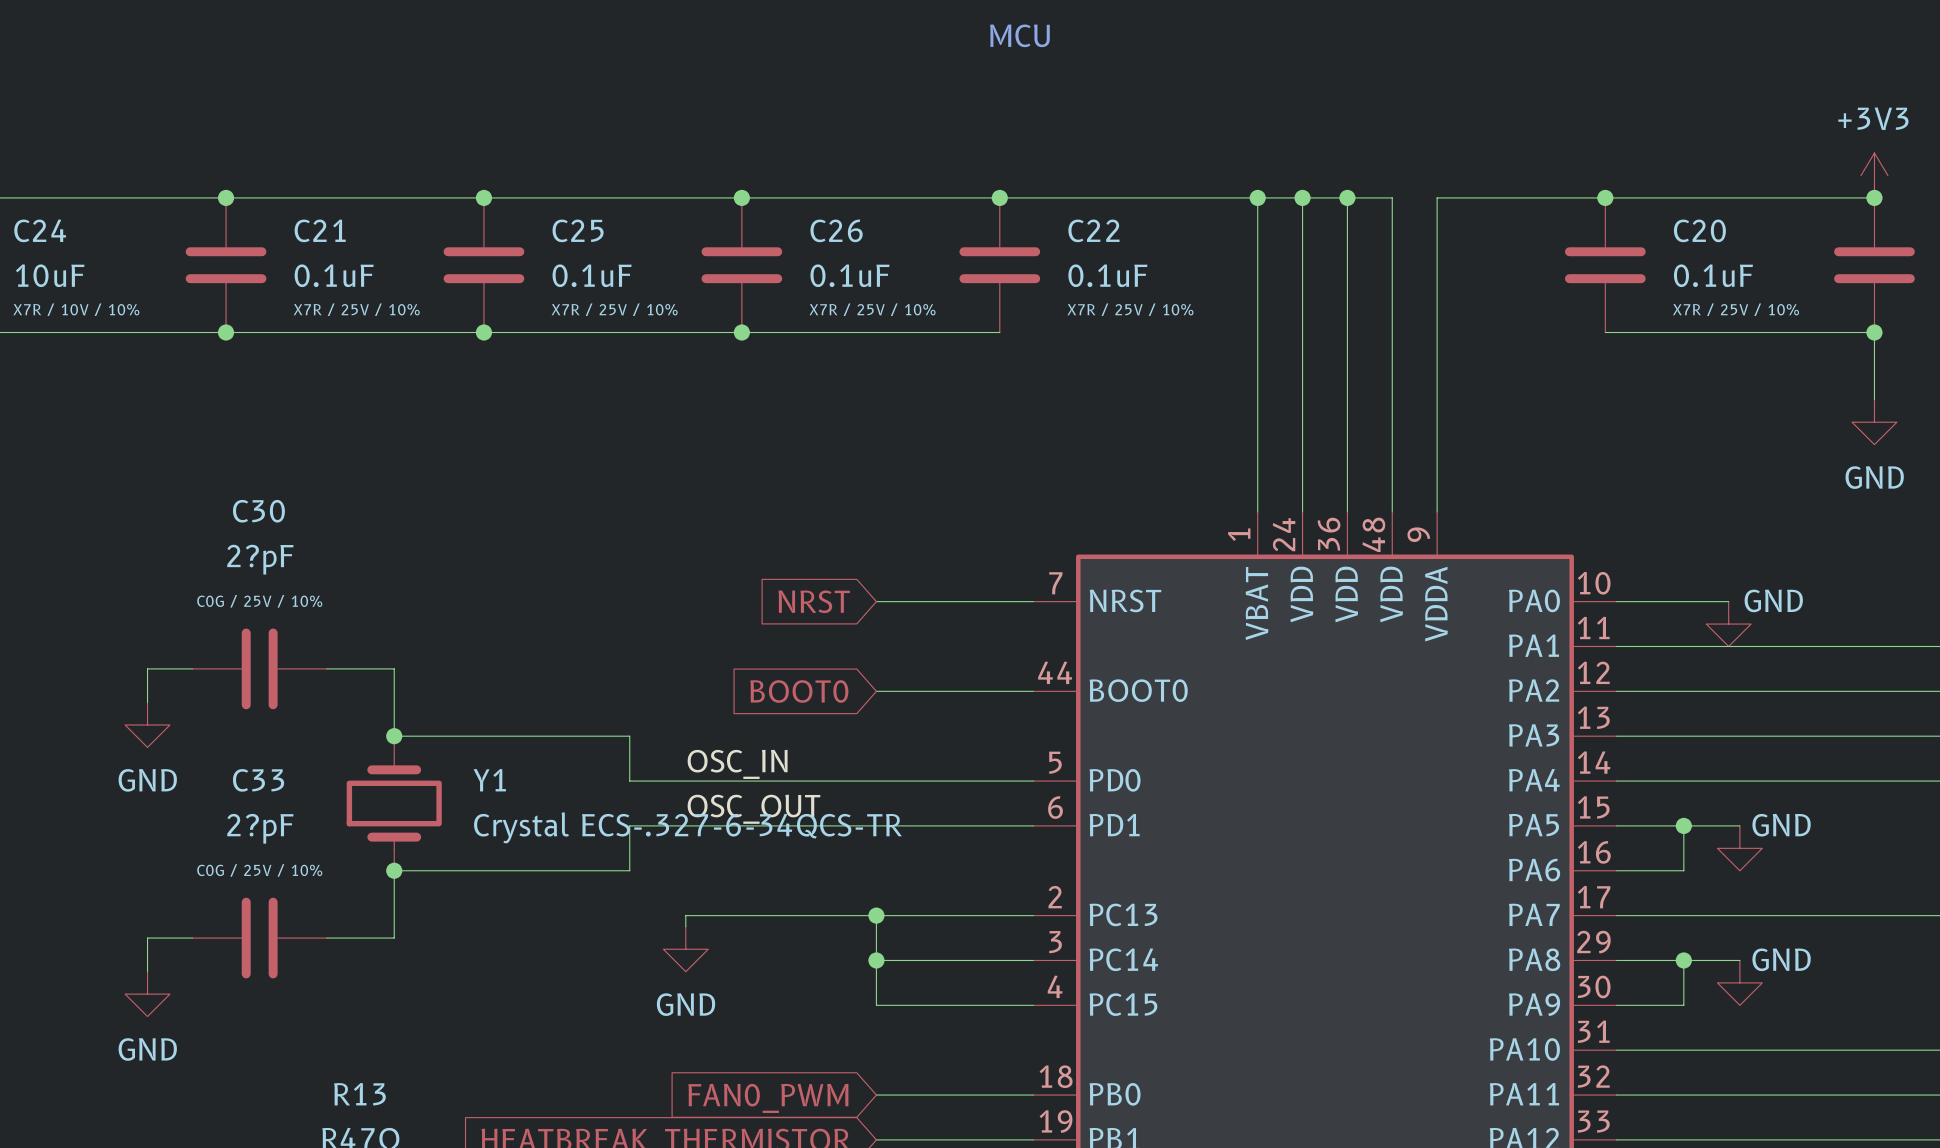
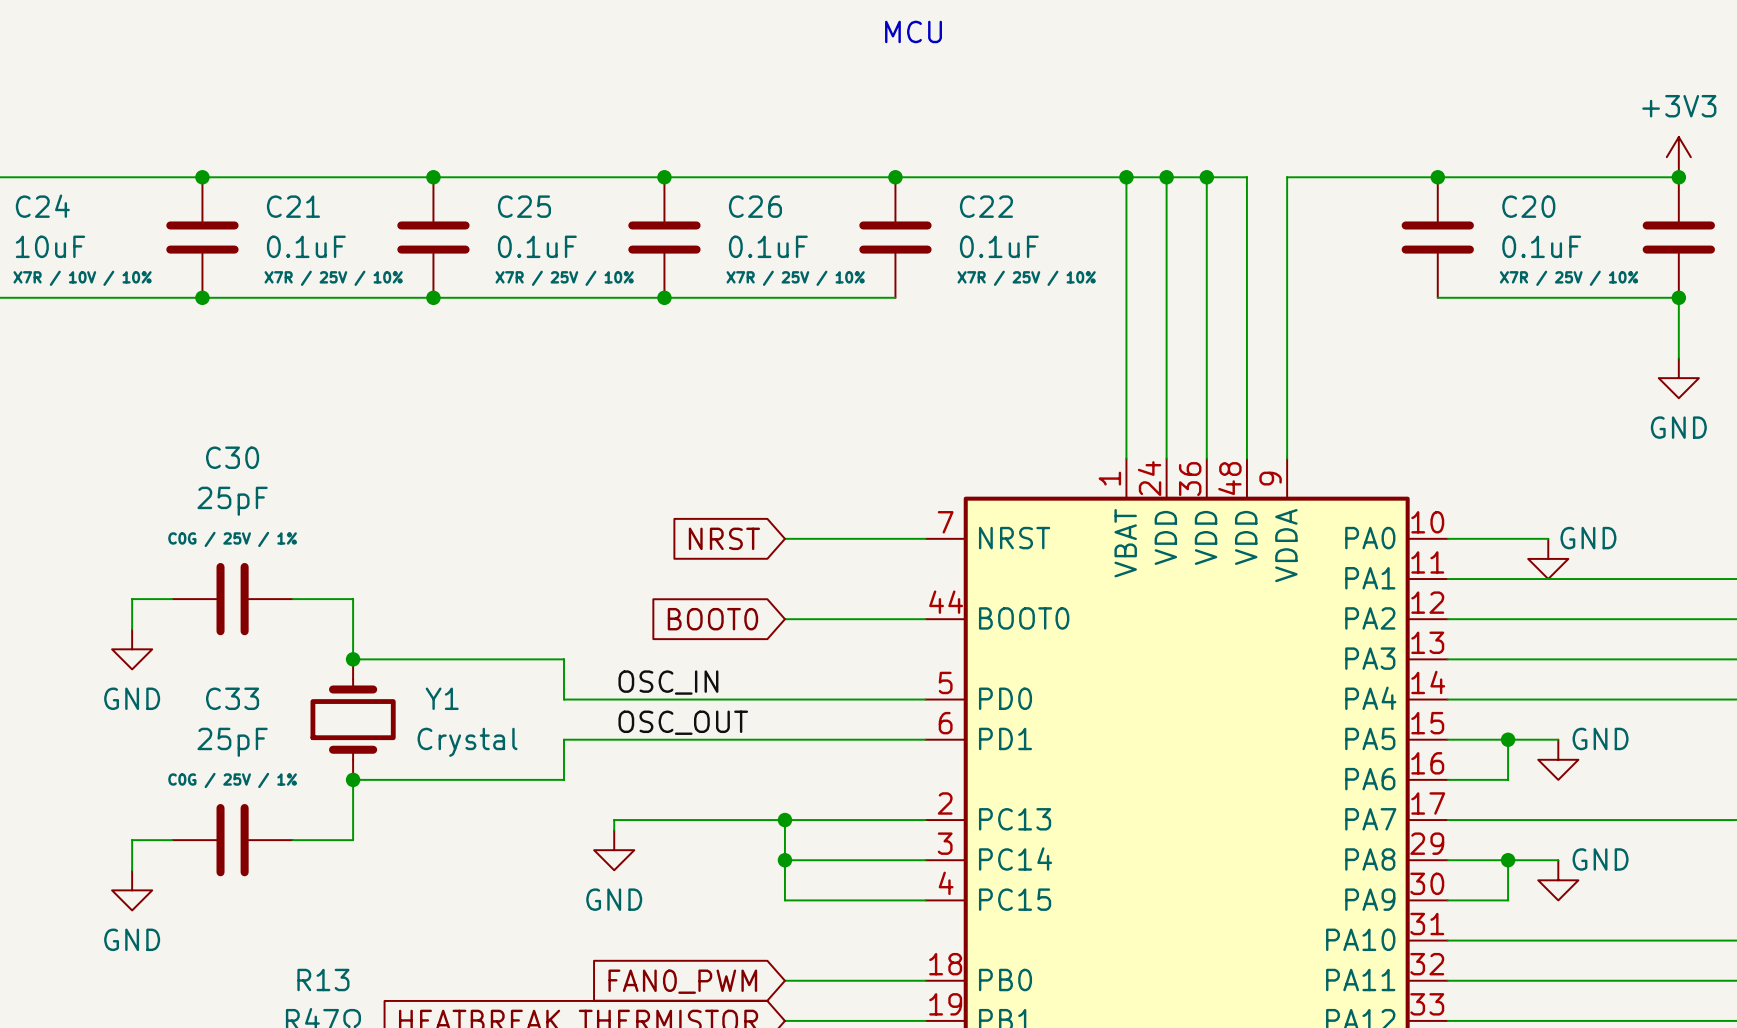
C30 value: 2?pF (260, 559) -> 25pF (232, 501)
C30 text: C0G / 25V / 10% (259, 601) -> C0G / 25V / 1% (232, 539)
Y1 value: Crystal ECS-.327-6-34QCS-TR (687, 827) -> Crystal (467, 742)
C33 value: 2?pF (260, 828) -> 25pF (232, 742)
C33 text: C0G / 25V / 10% (259, 870) -> C0G / 25V / 1% (232, 780)

